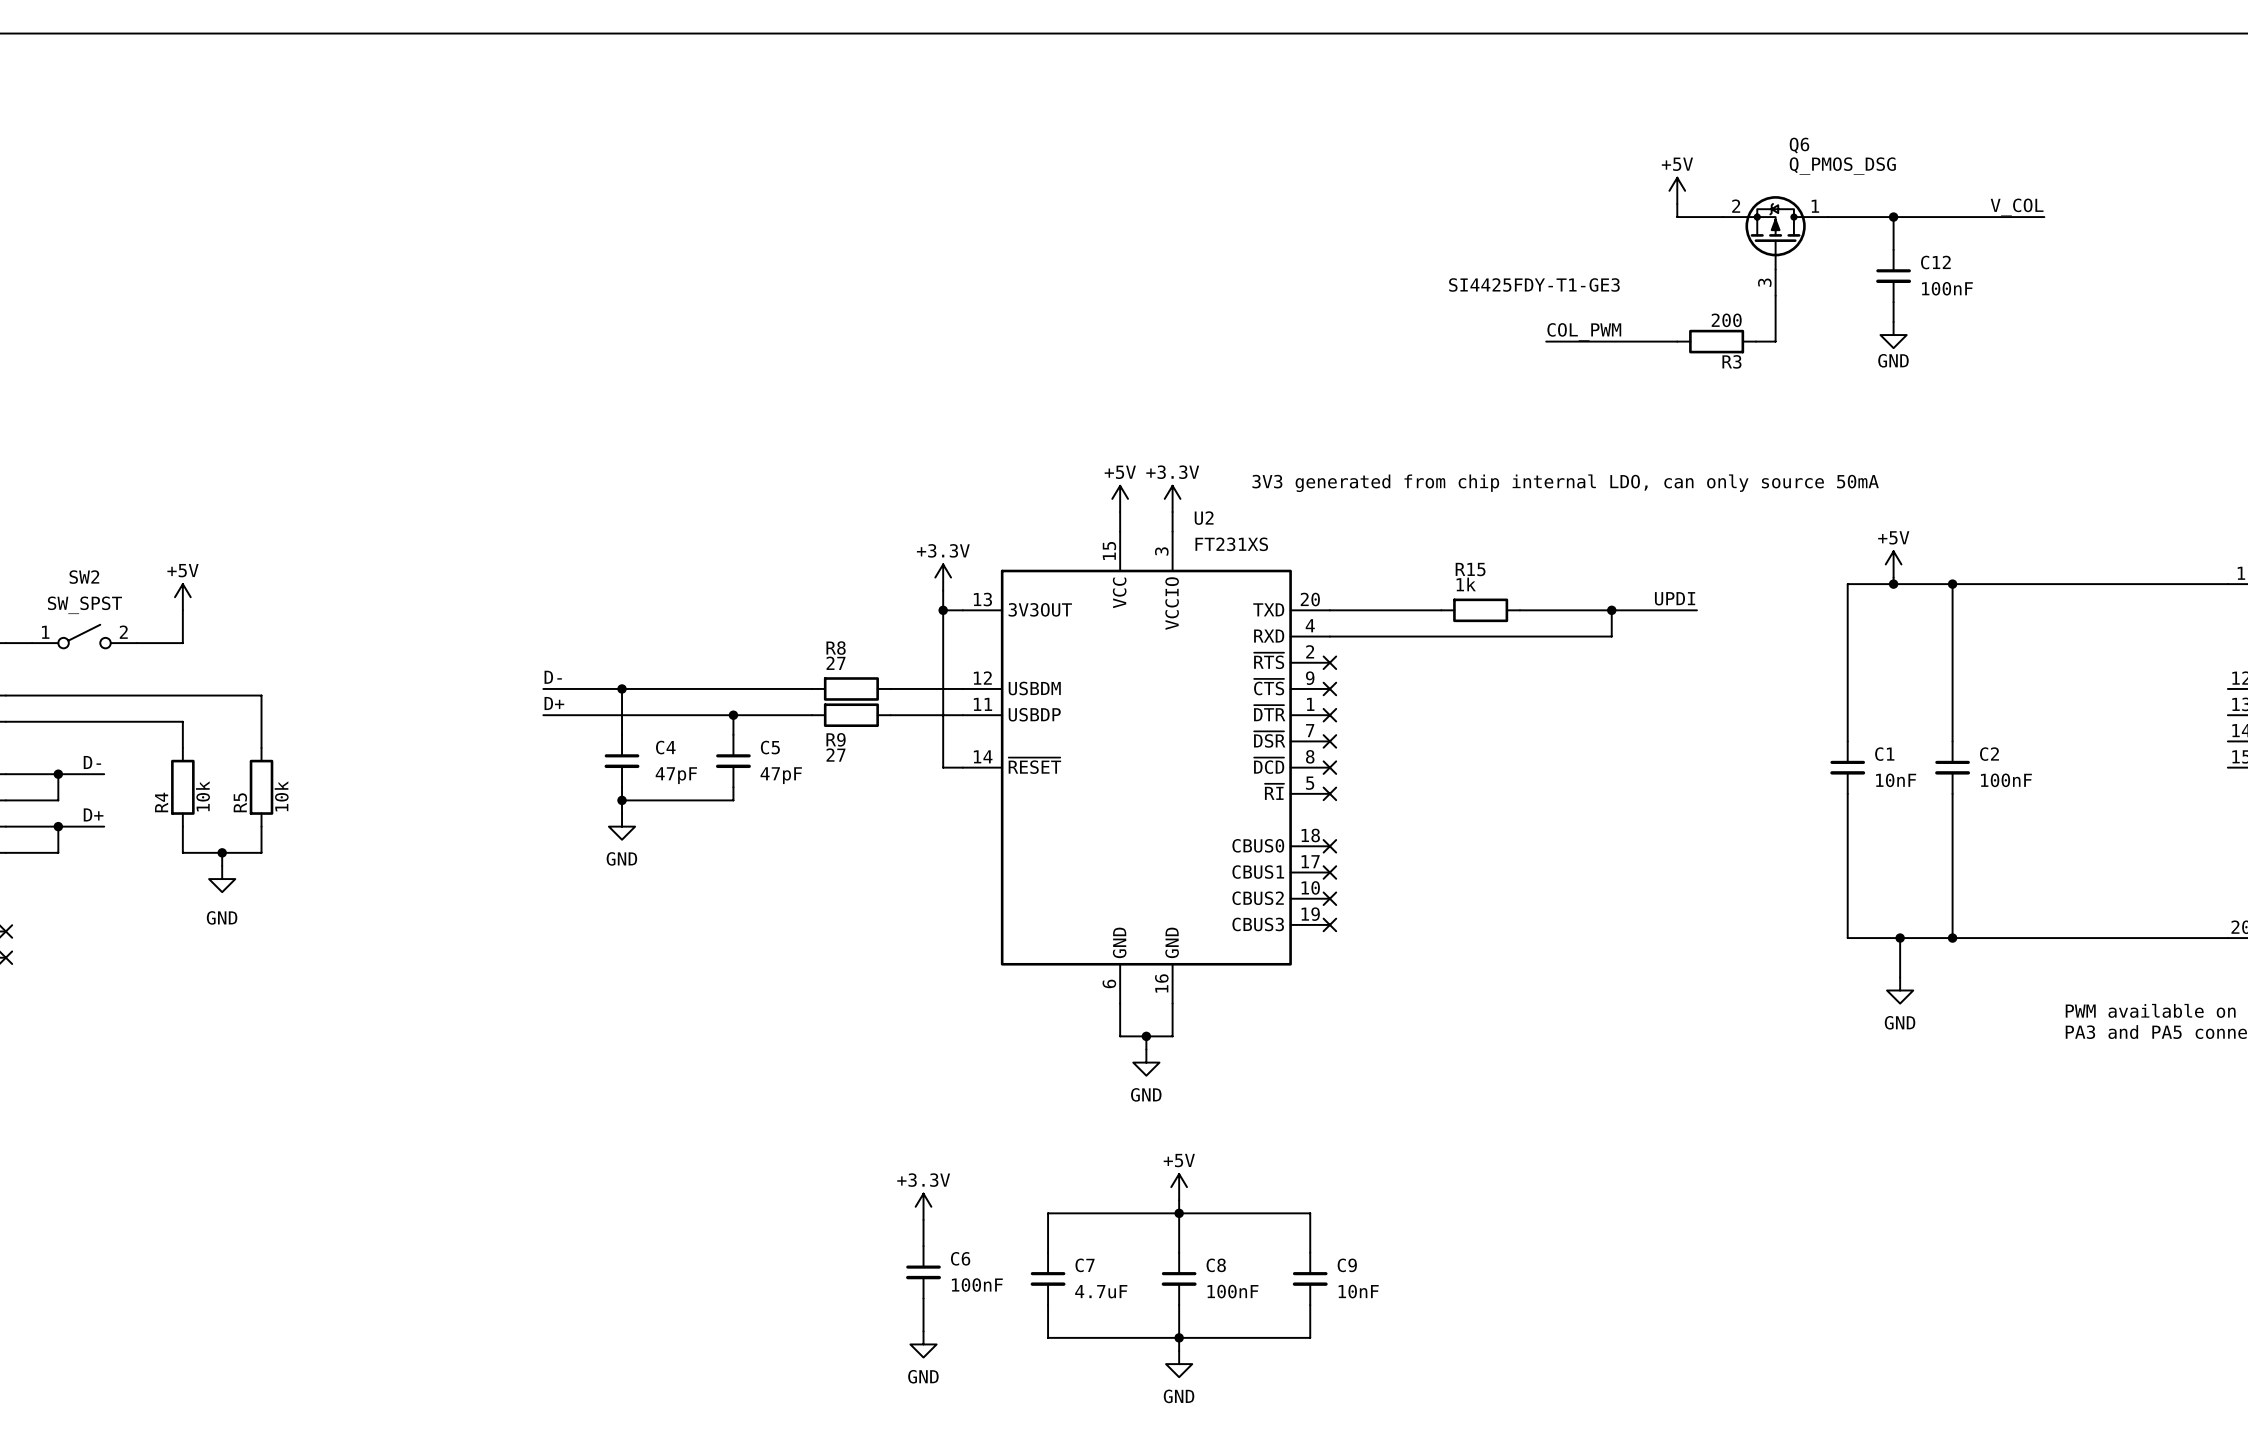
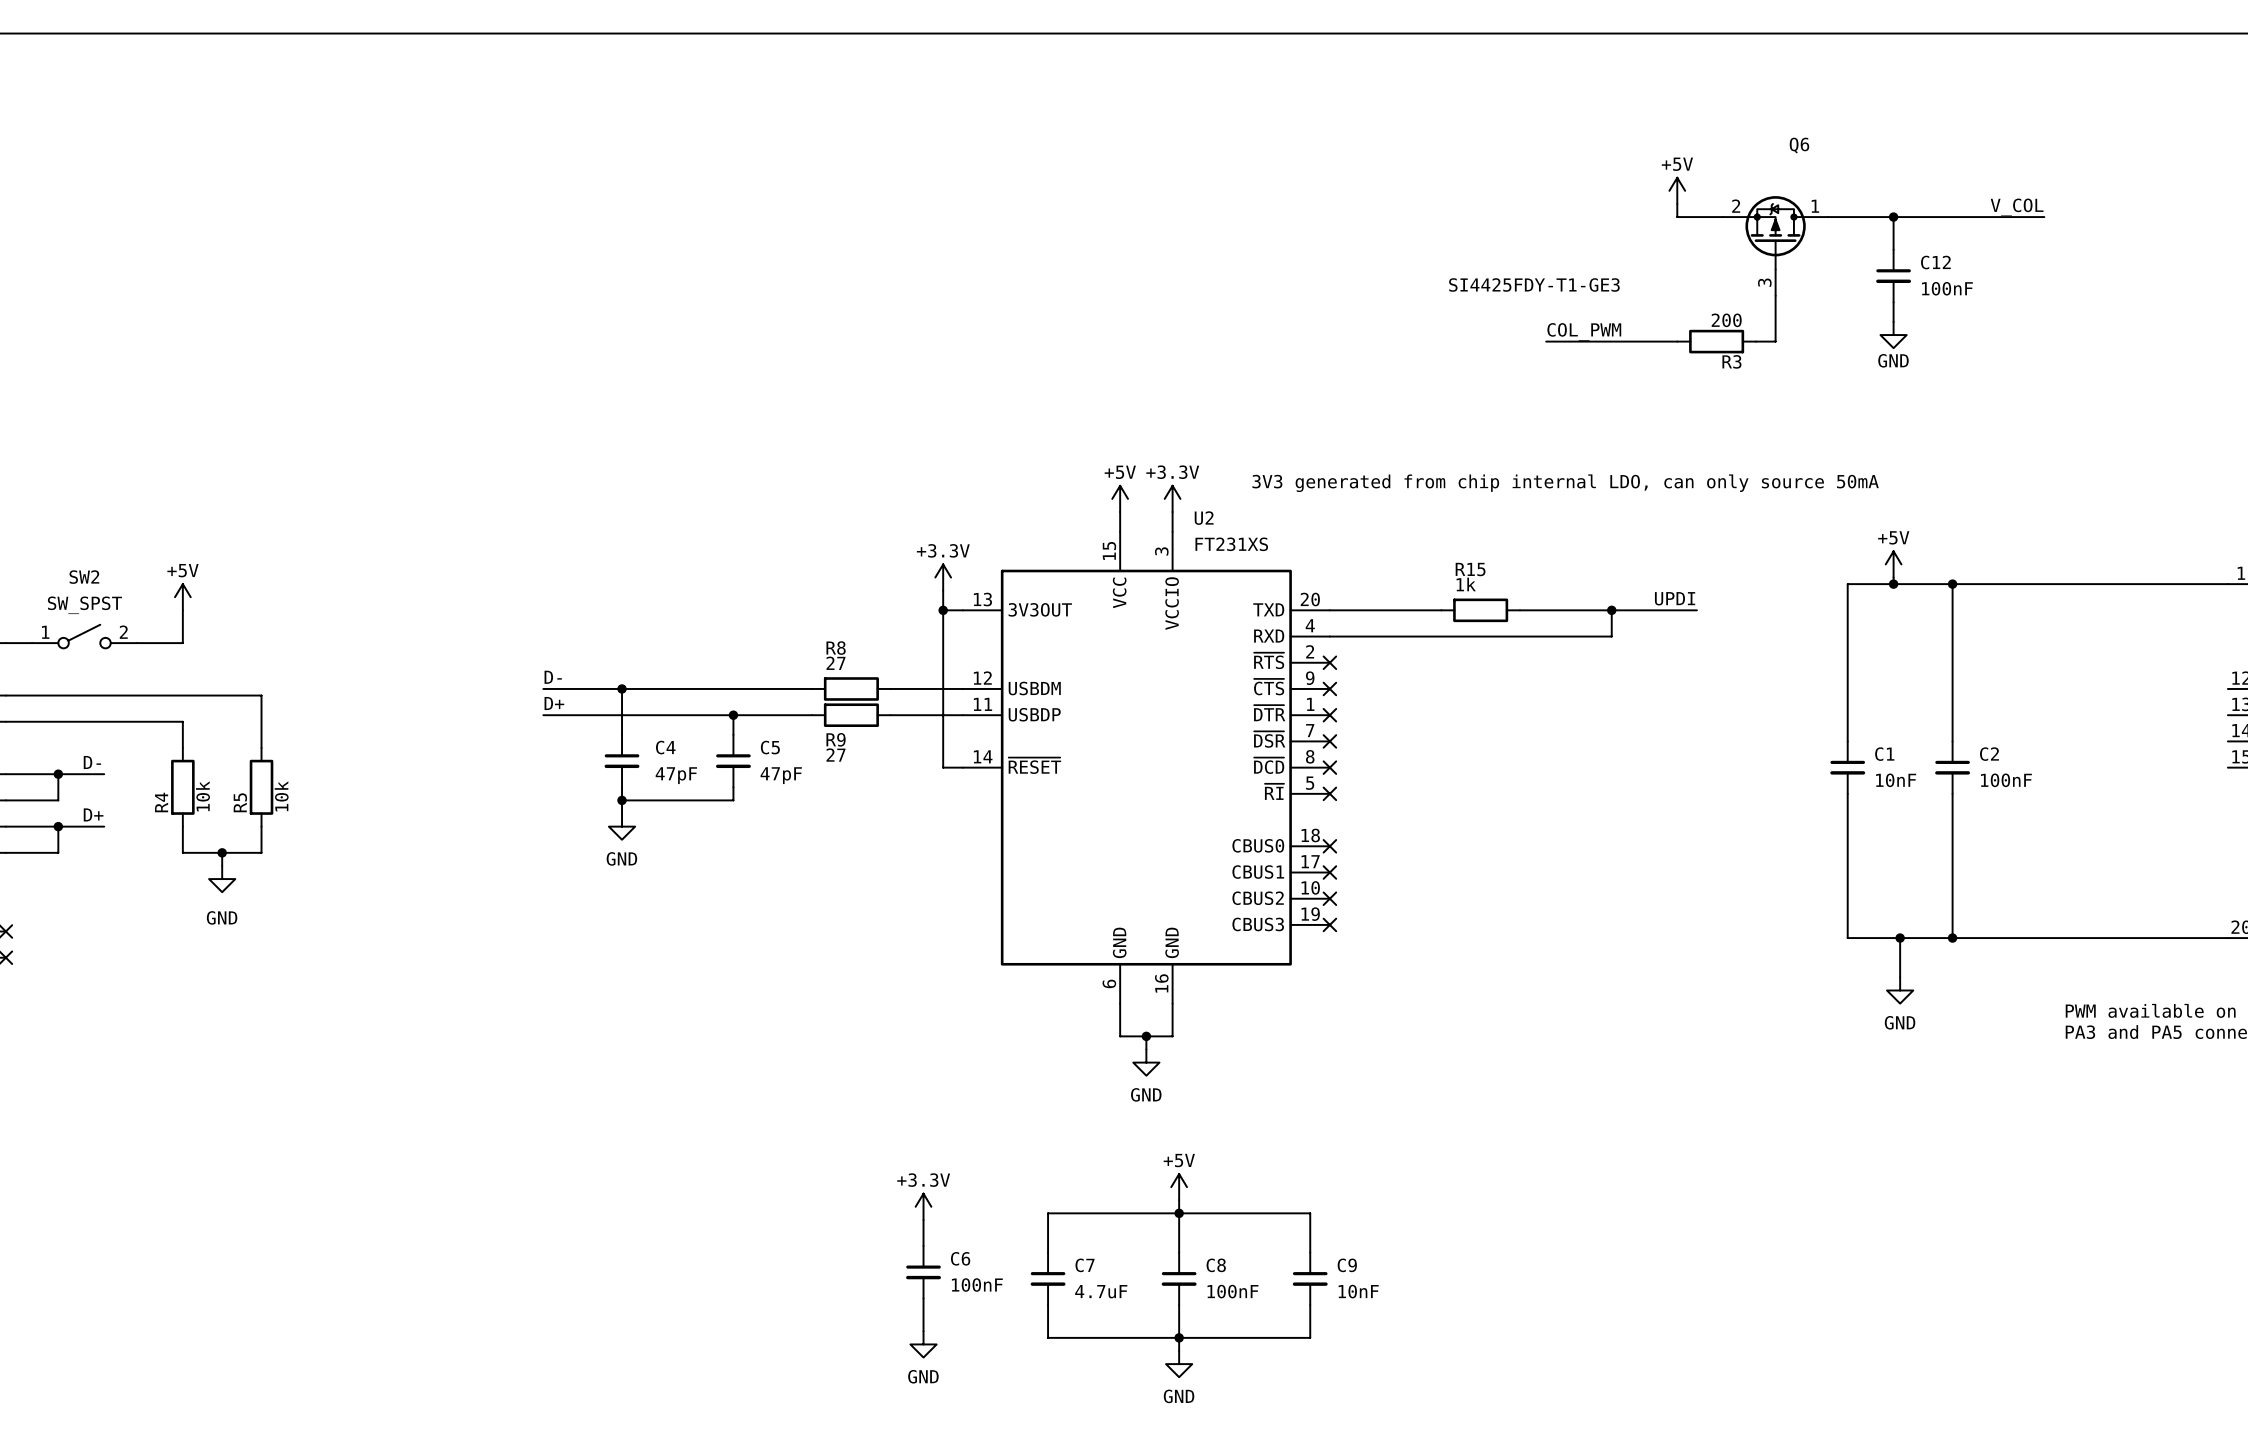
Q6 value: Q_PMOS_DSG (1842, 166) -> none

